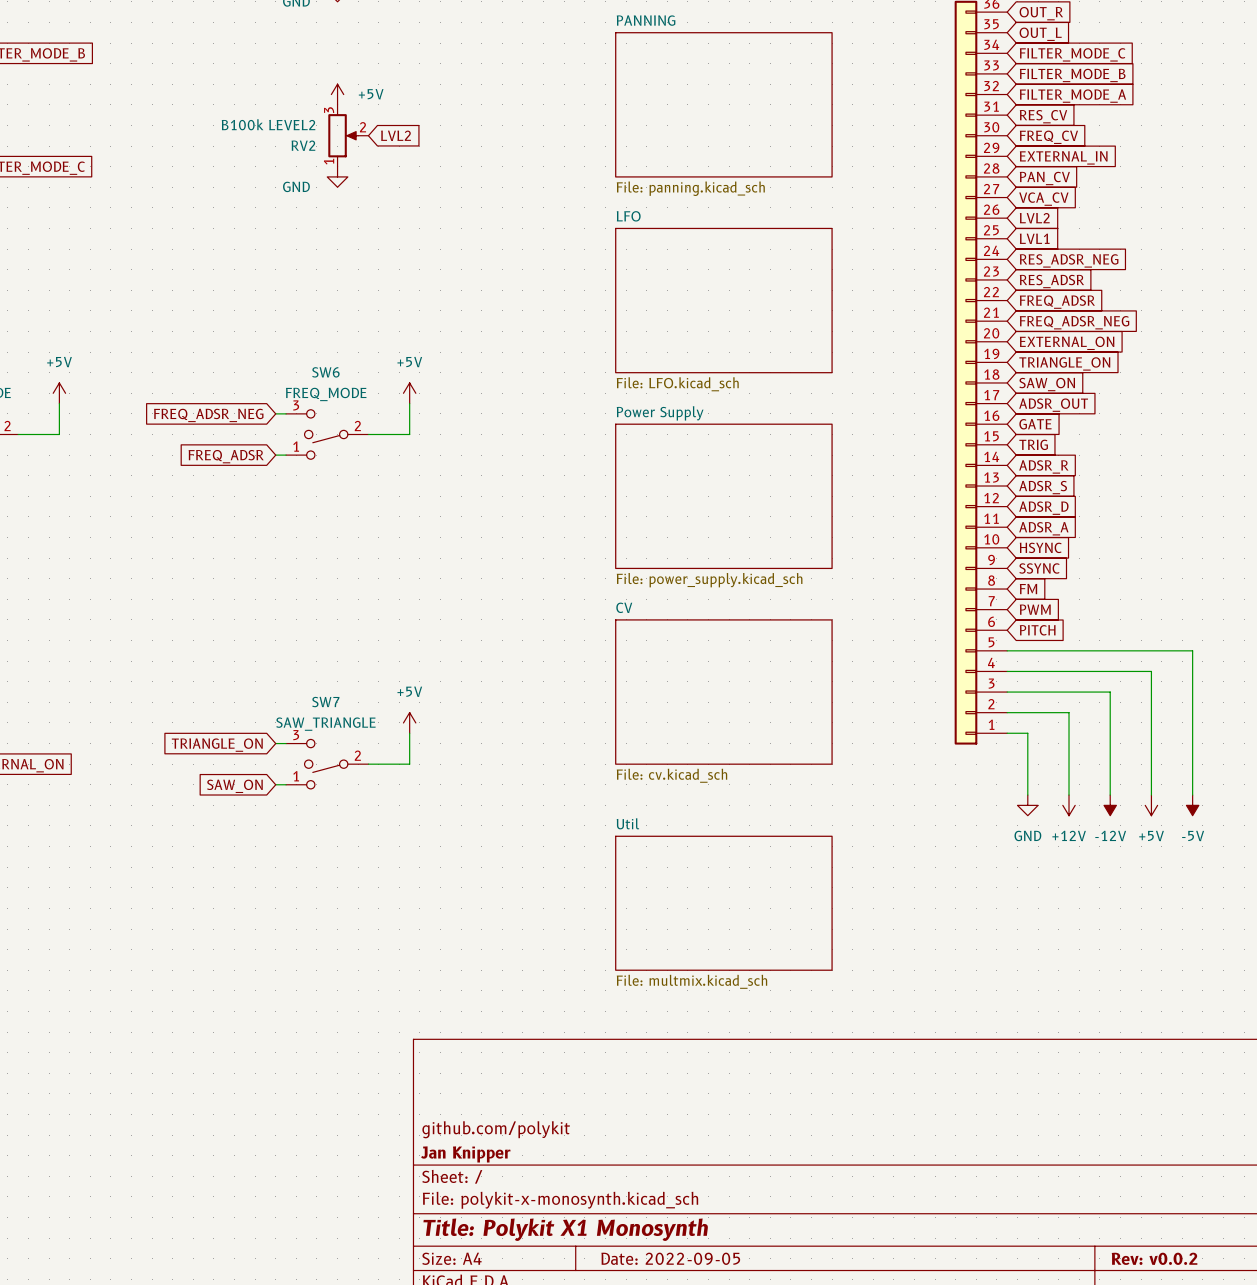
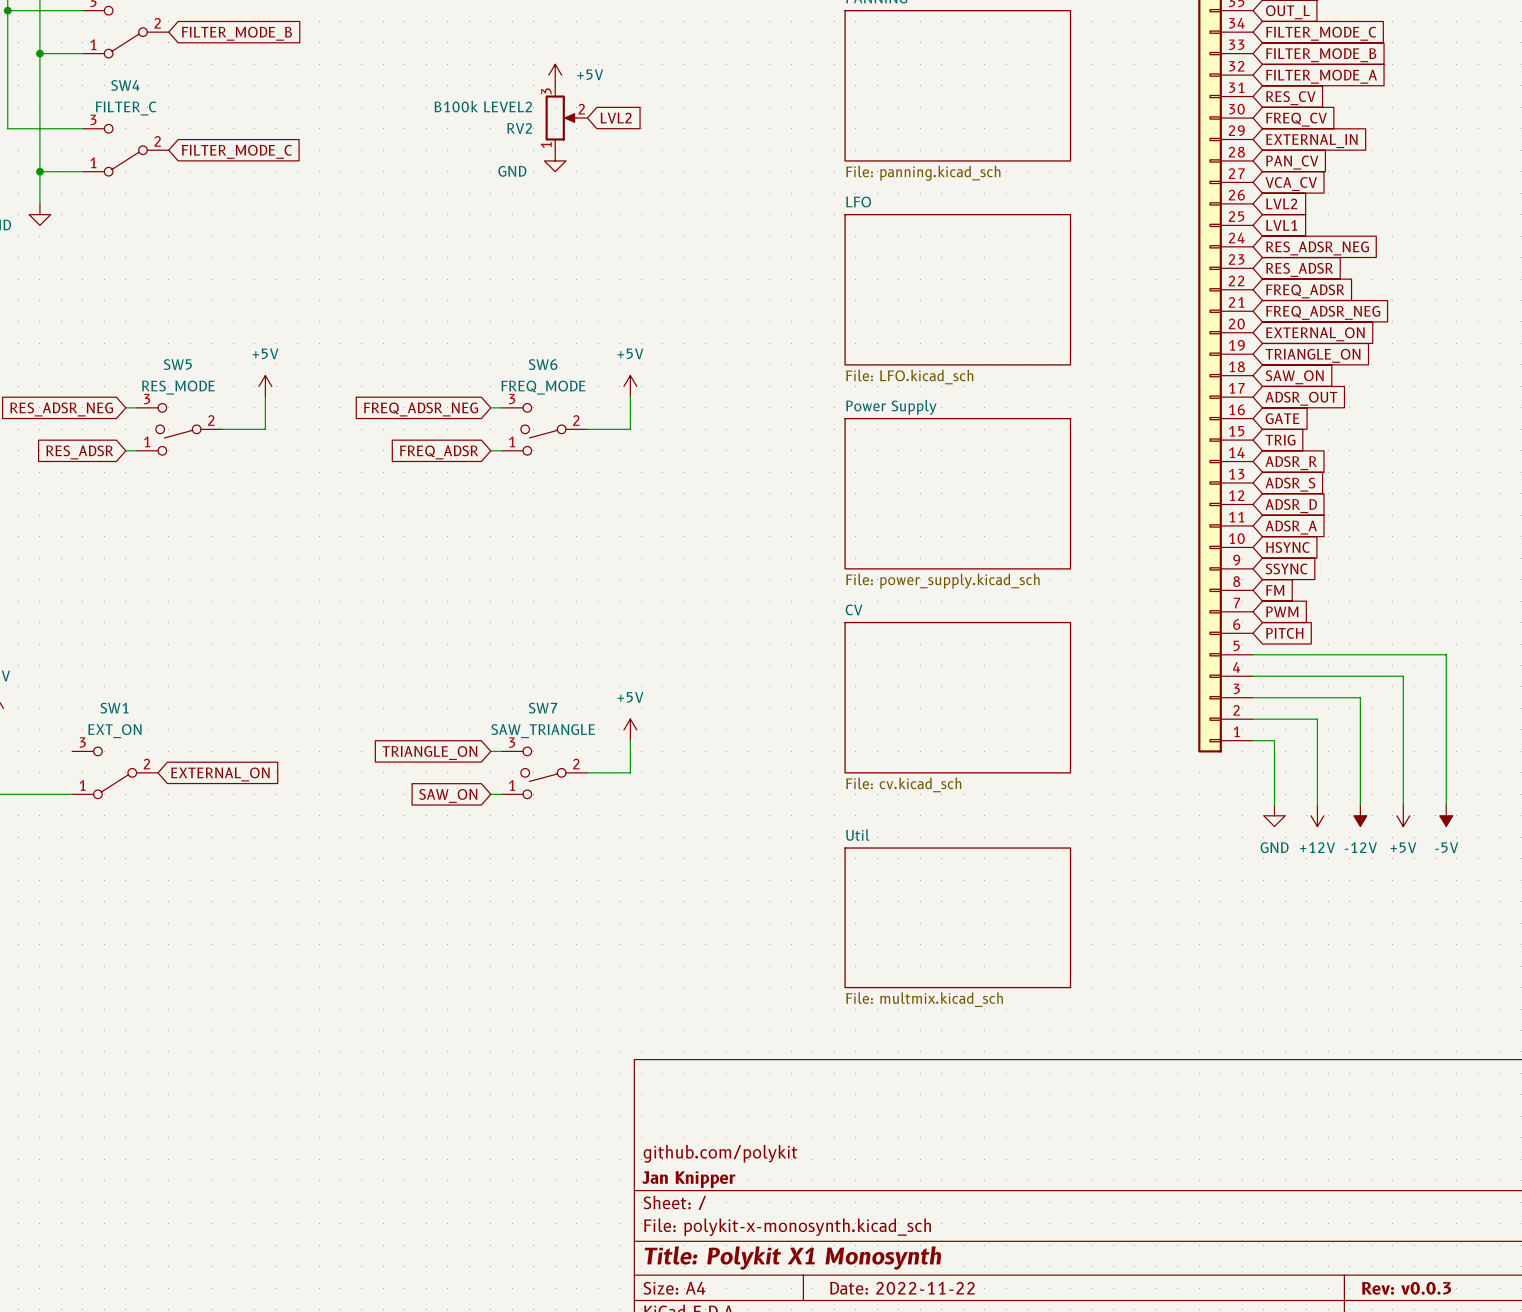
title block: Date: 2022-09-05 (670, 1258) -> Date: 2022-11-22 (902, 1288)
title block: Rev: v0.0.2 (1154, 1258) -> Rev: v0.0.3 (1406, 1288)

